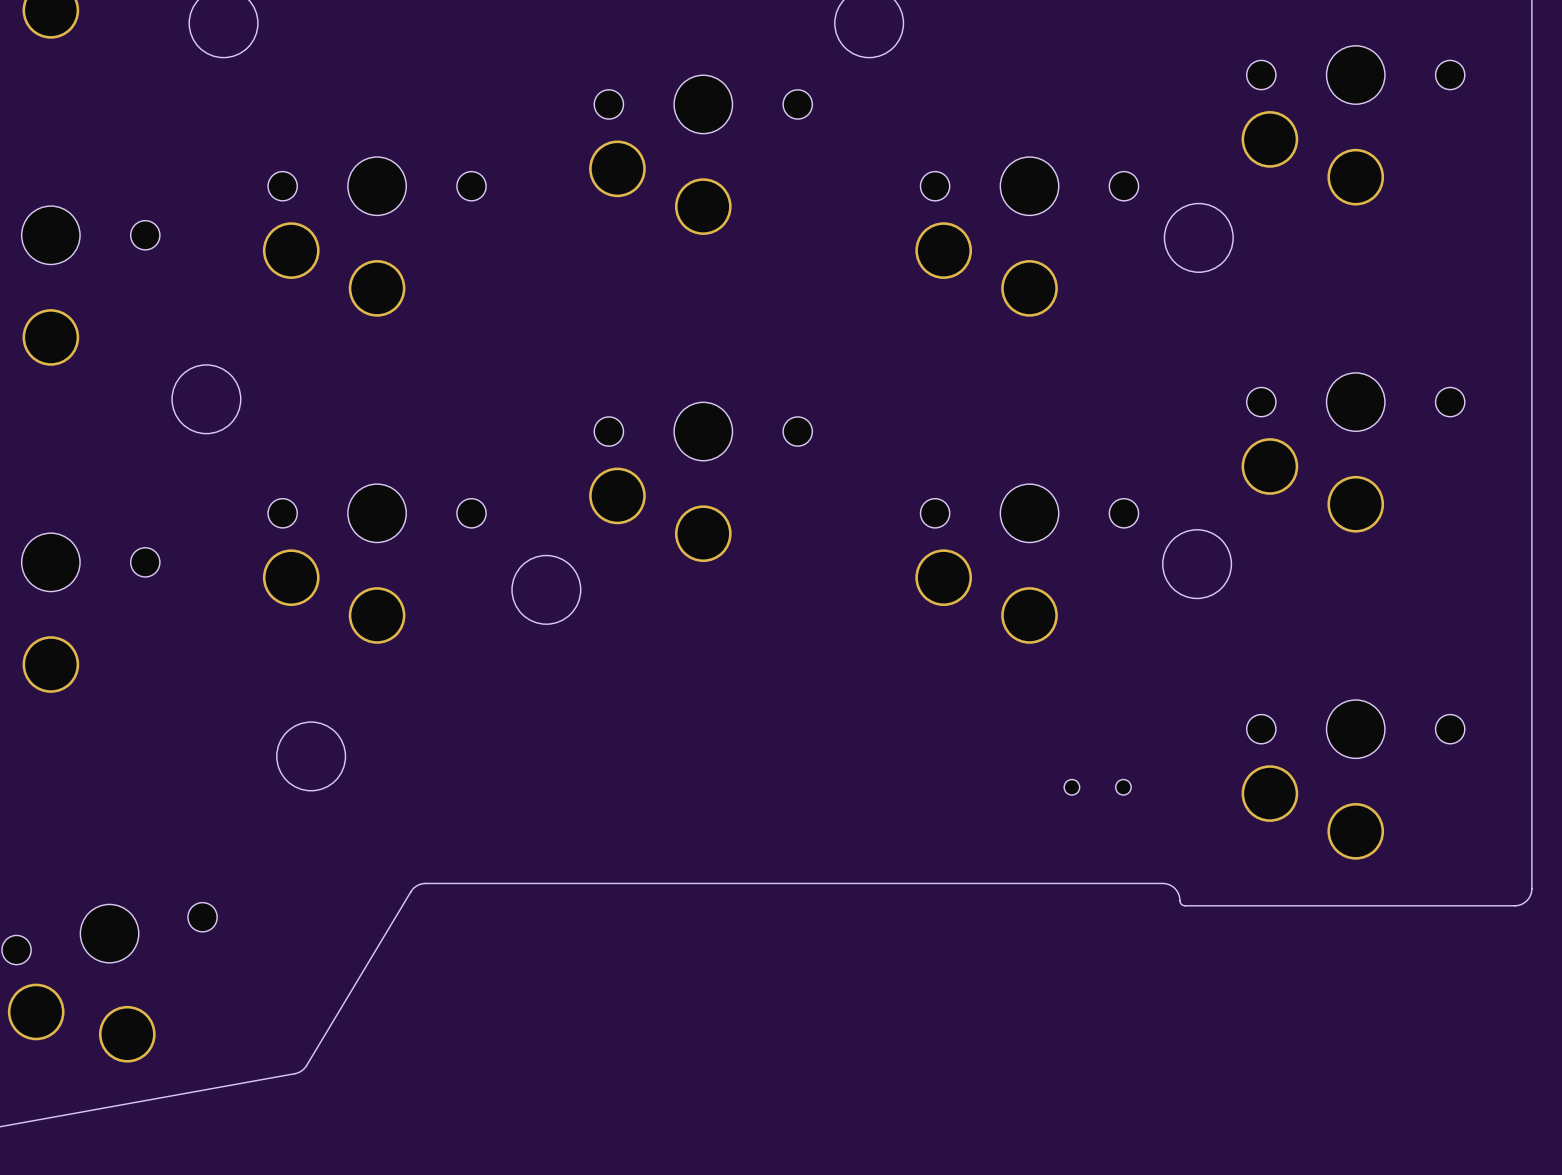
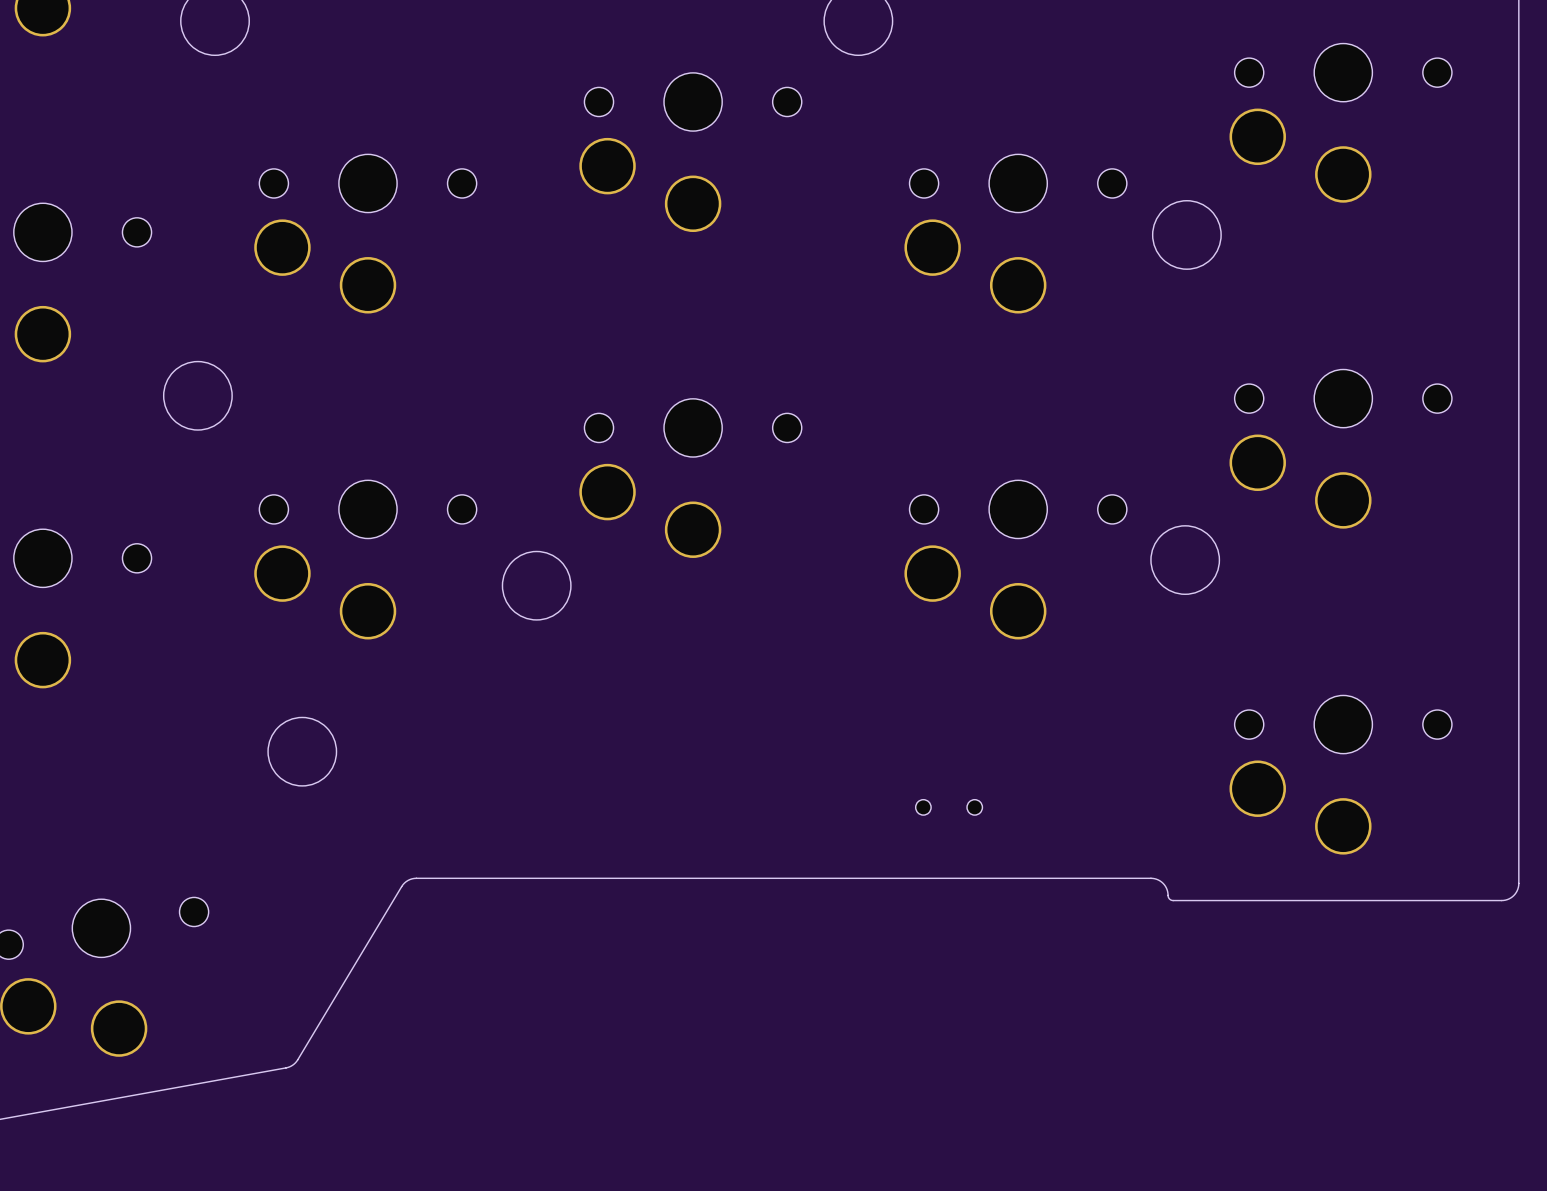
part position: (1097, 787) -> (949, 807)

